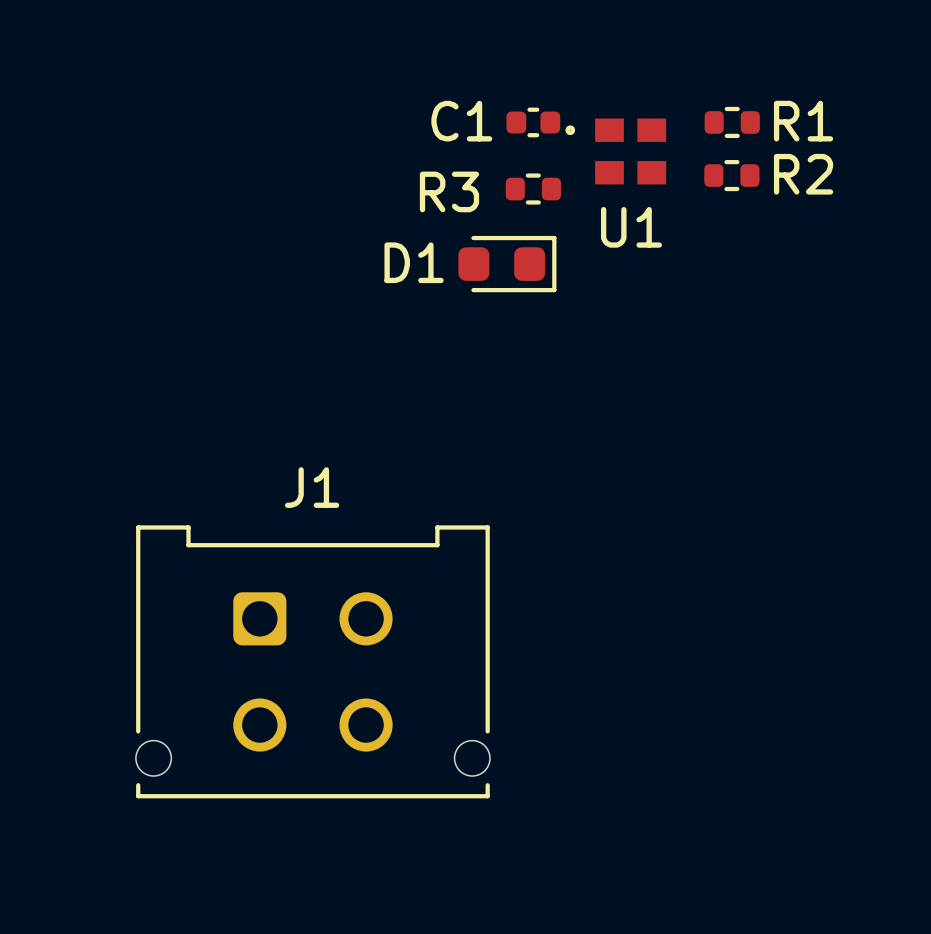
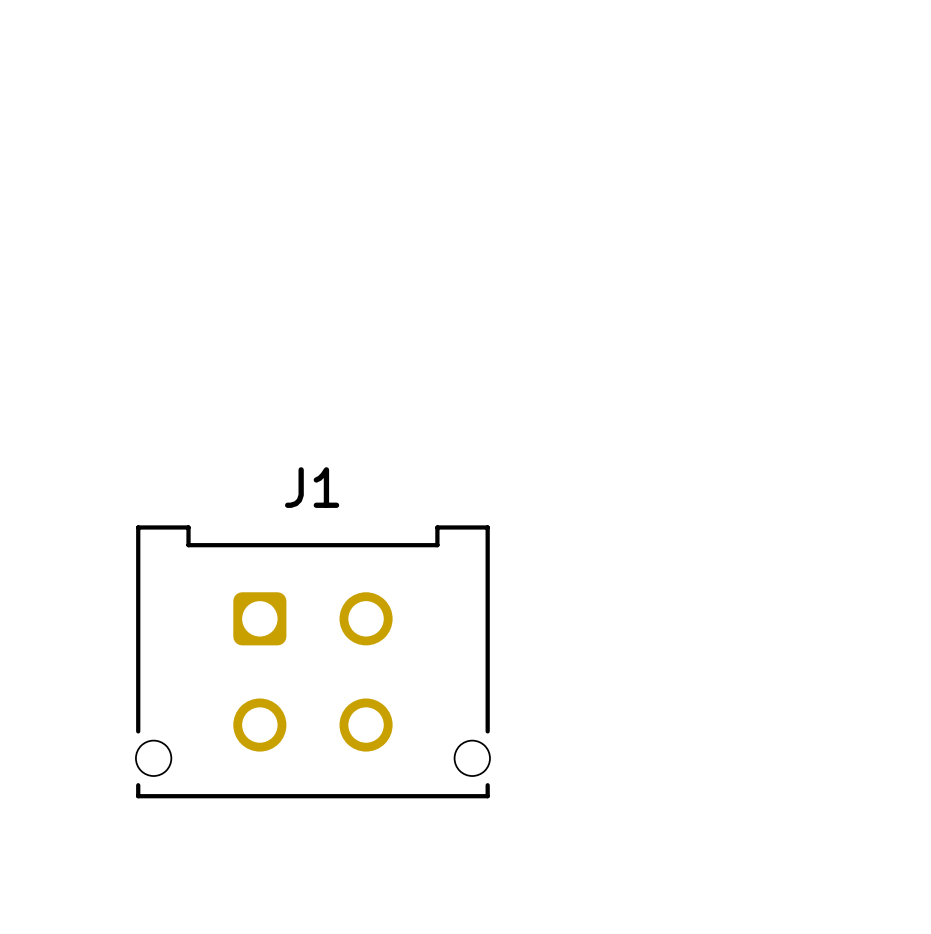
C1: (533, 122) -> none
R1: (732, 122) -> none
U1: (615, 151) -> none
R2: (731, 175) -> none
R3: (533, 189) -> none
D1: (507, 264) -> none

